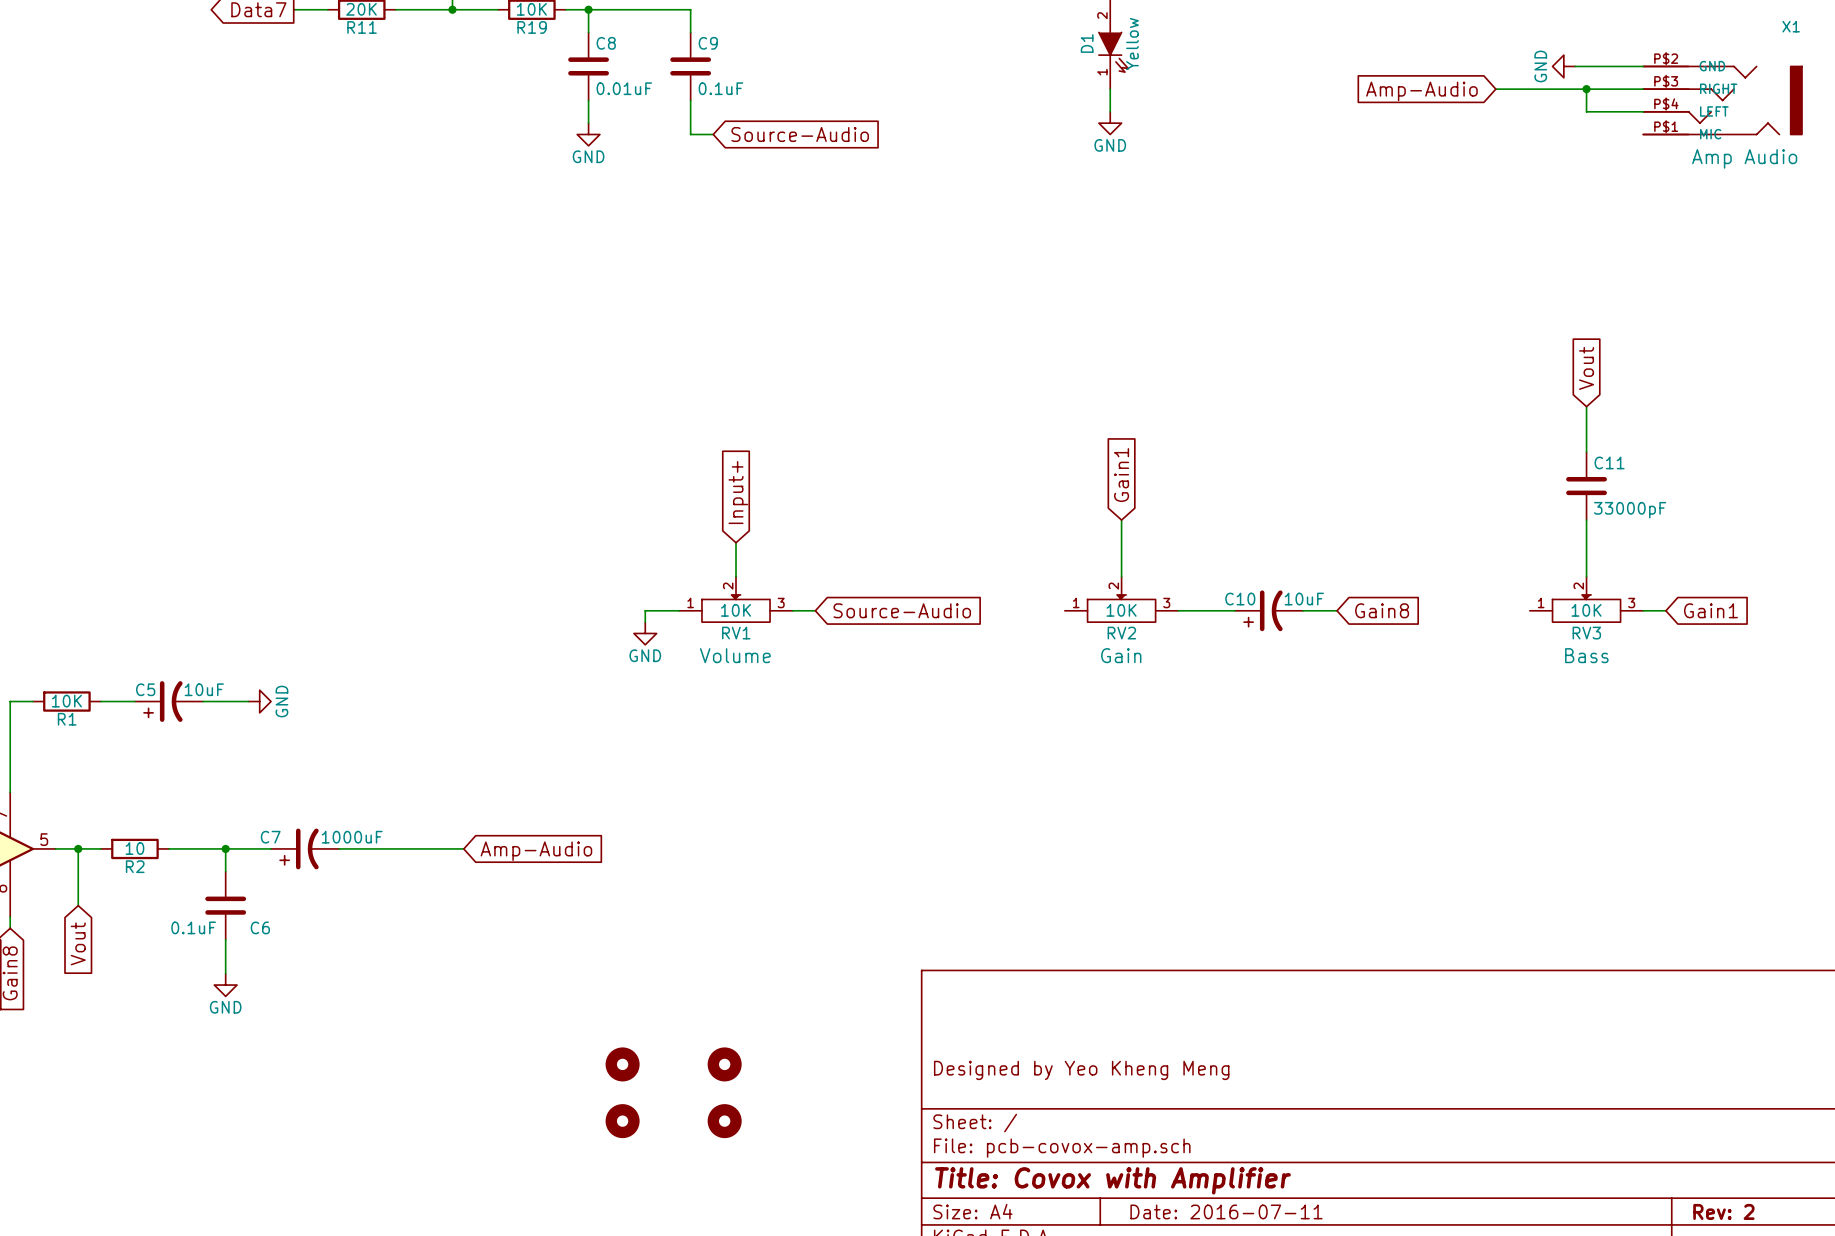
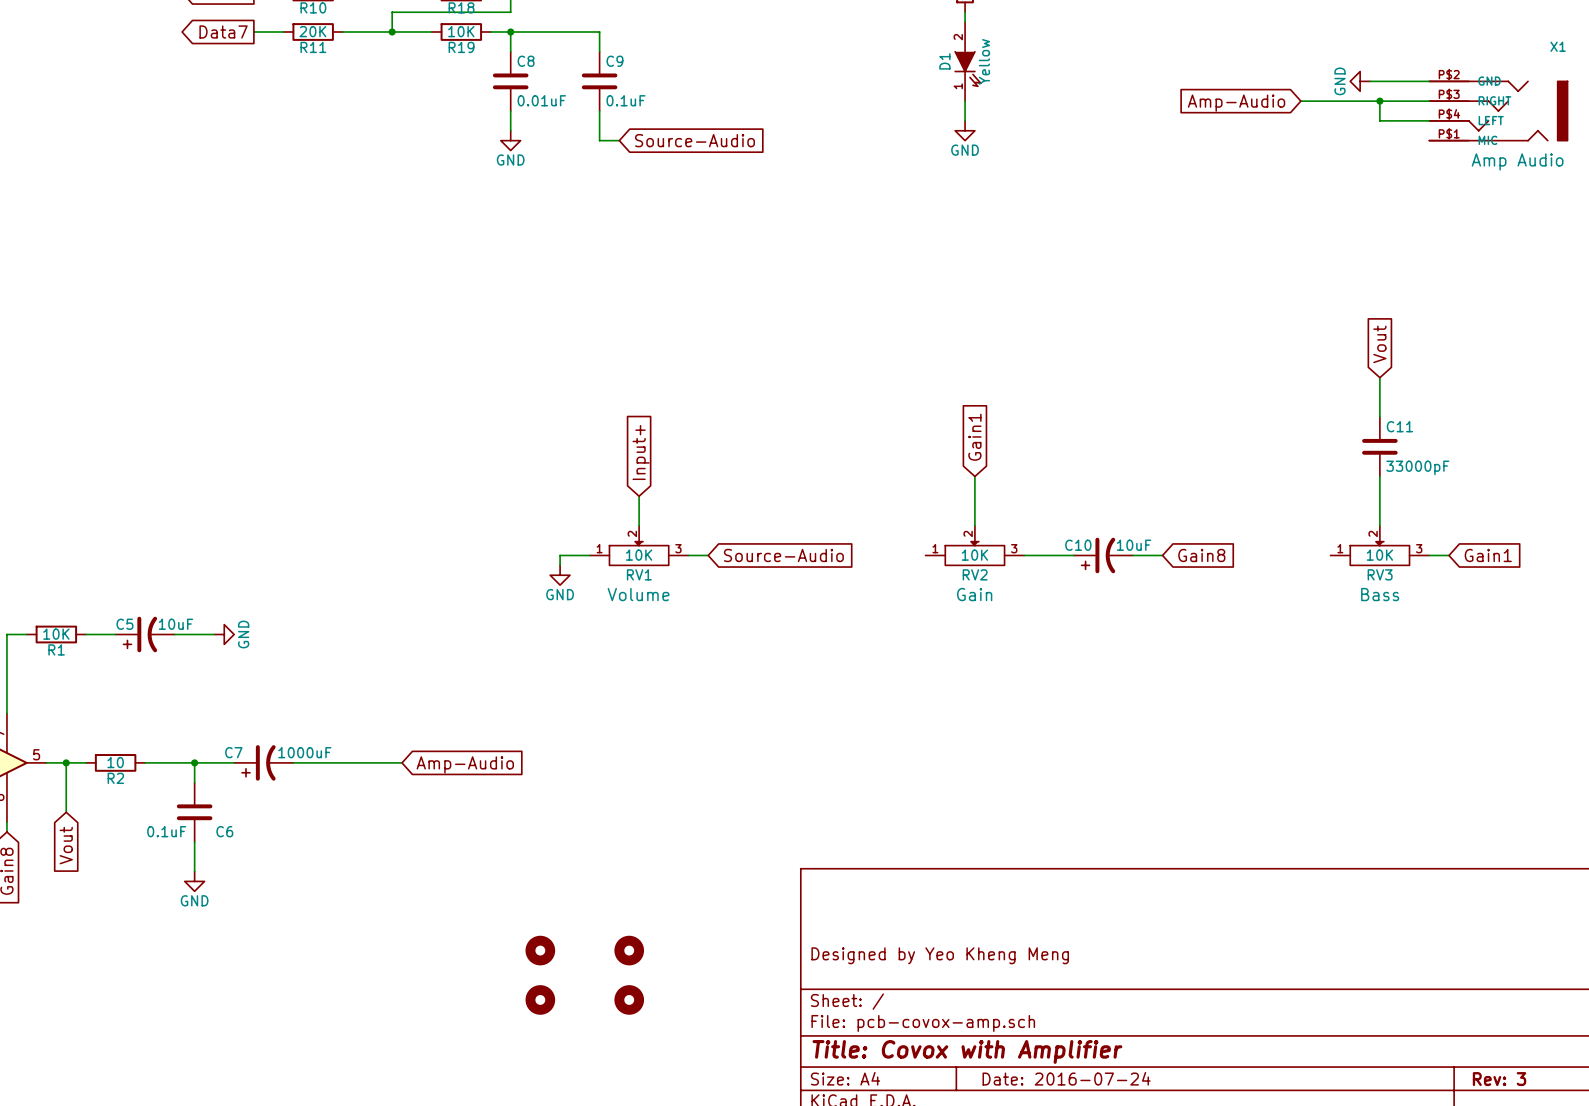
title block: Date: 2016-07-11 (1226, 1211) -> Date: 2016-07-24 (1066, 1078)
title block: Rev: 2 (1723, 1211) -> Rev: 3 (1499, 1079)

